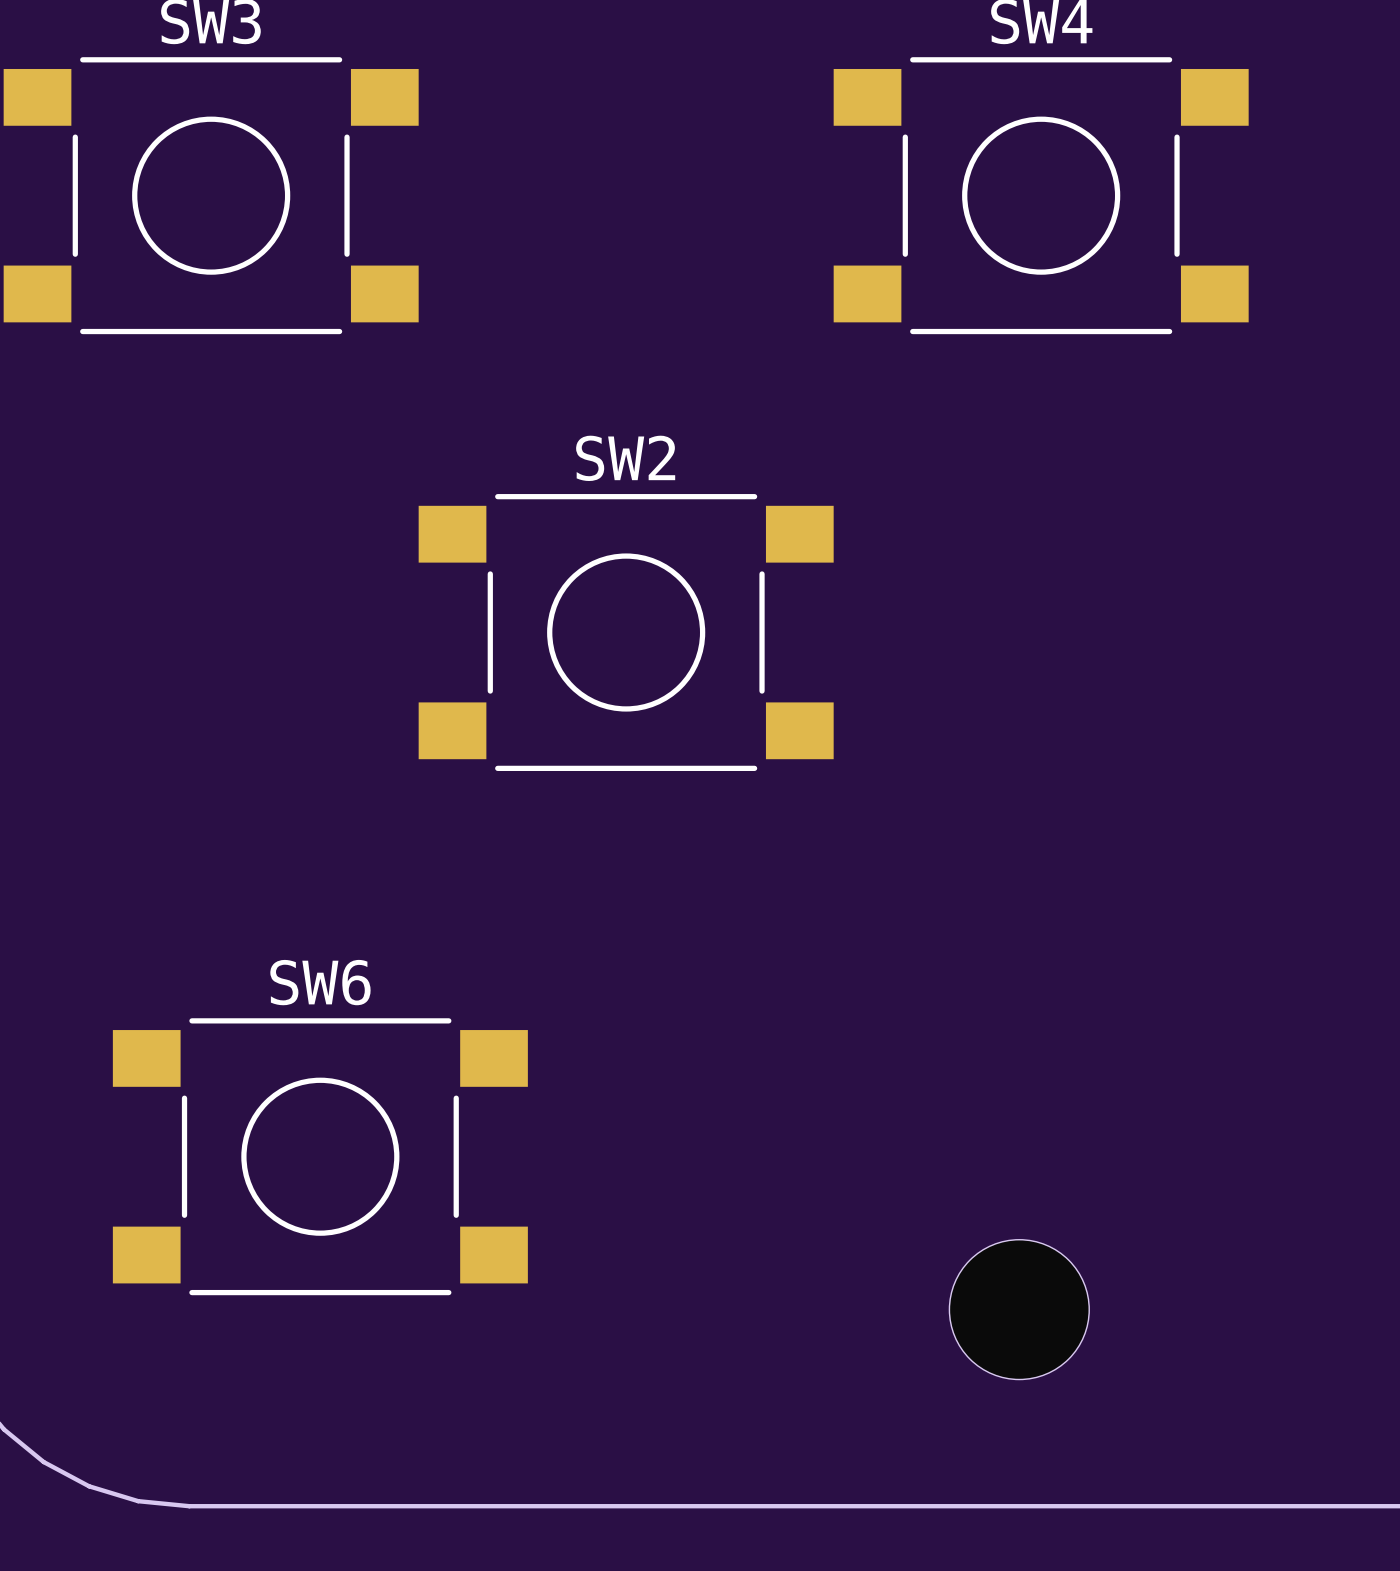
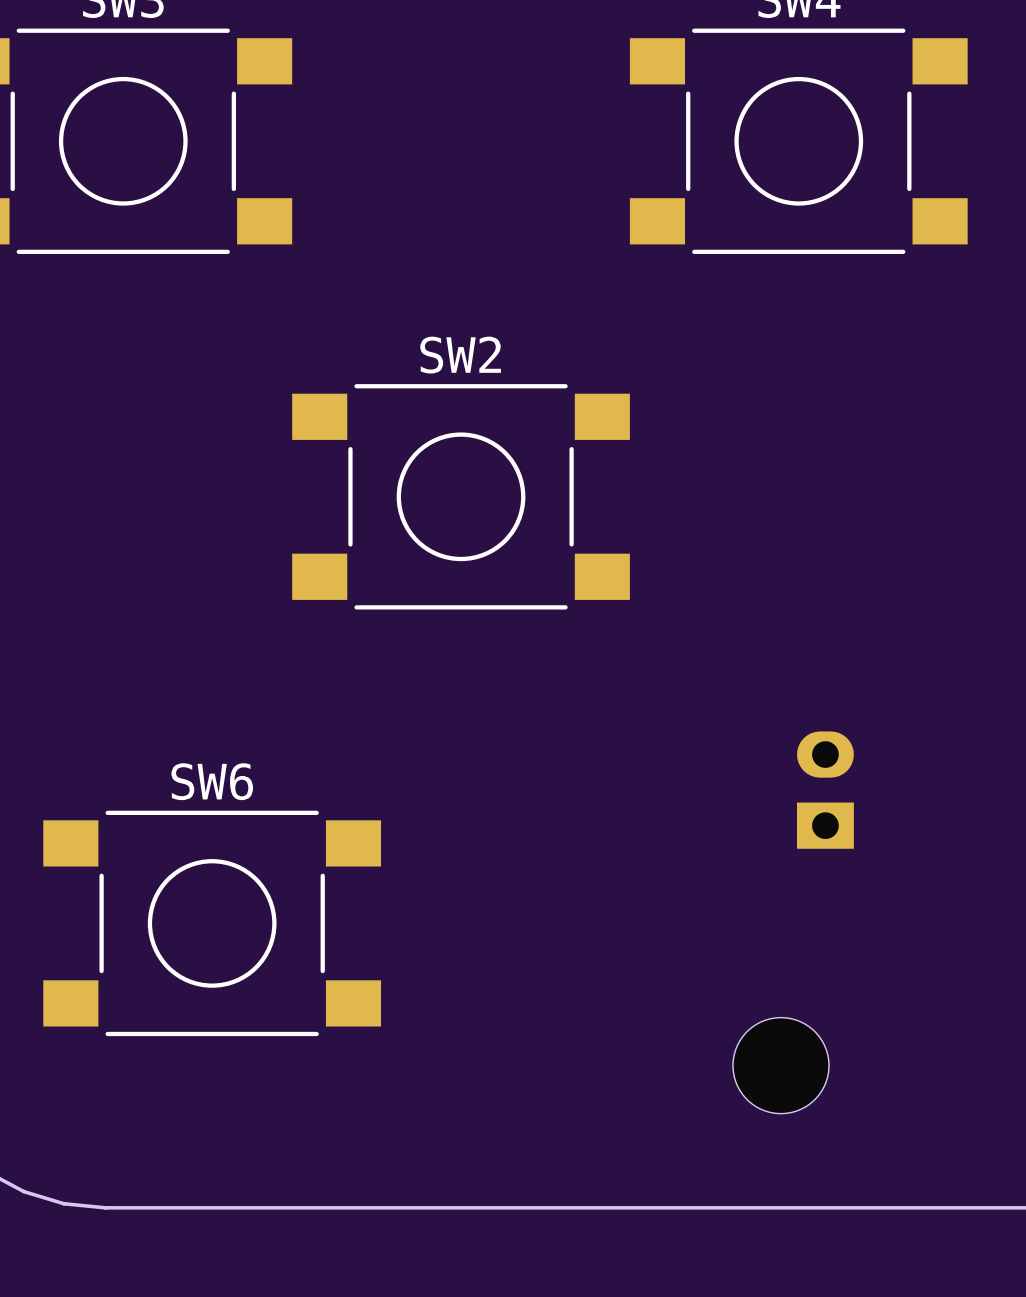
part: none -> (825, 790)
part footprint: [949, 1239, 1090, 1380] -> [733, 1017, 829, 1114]

